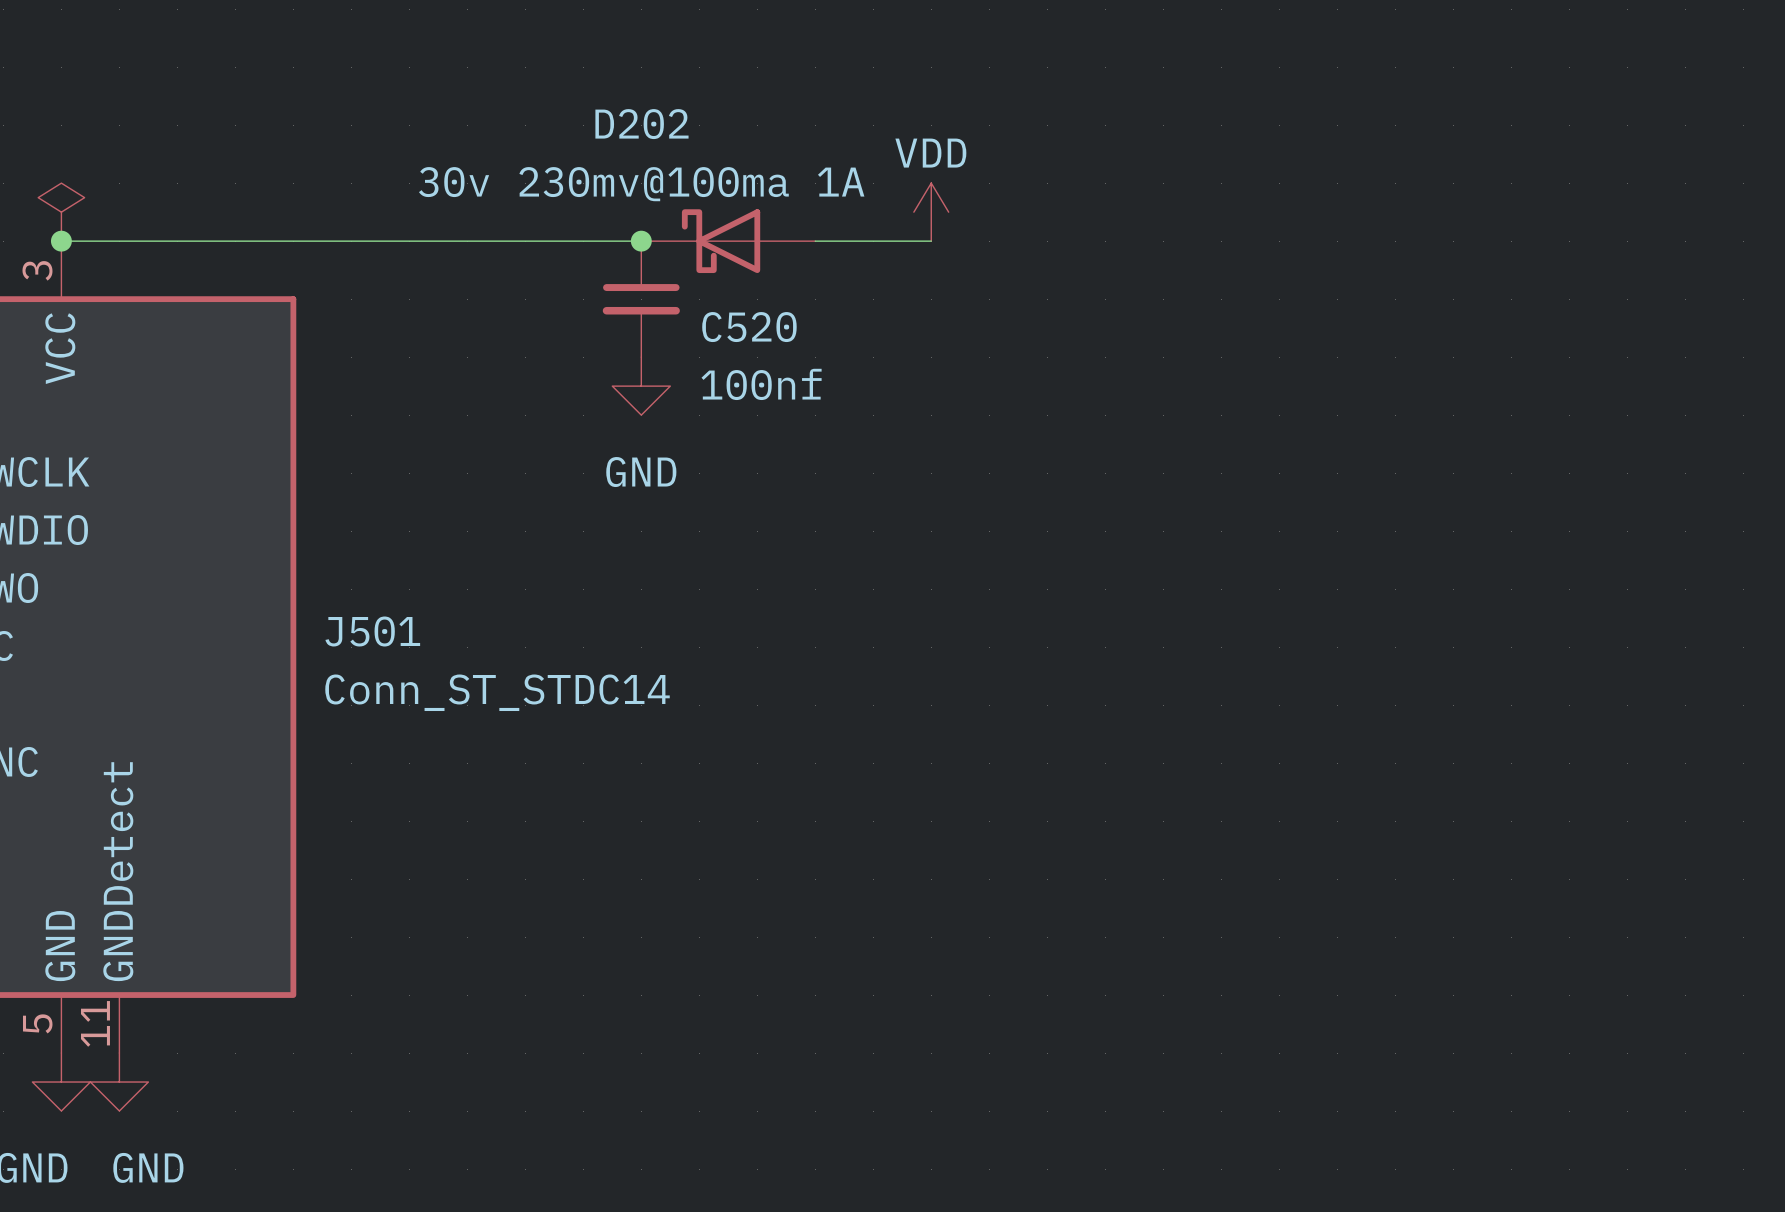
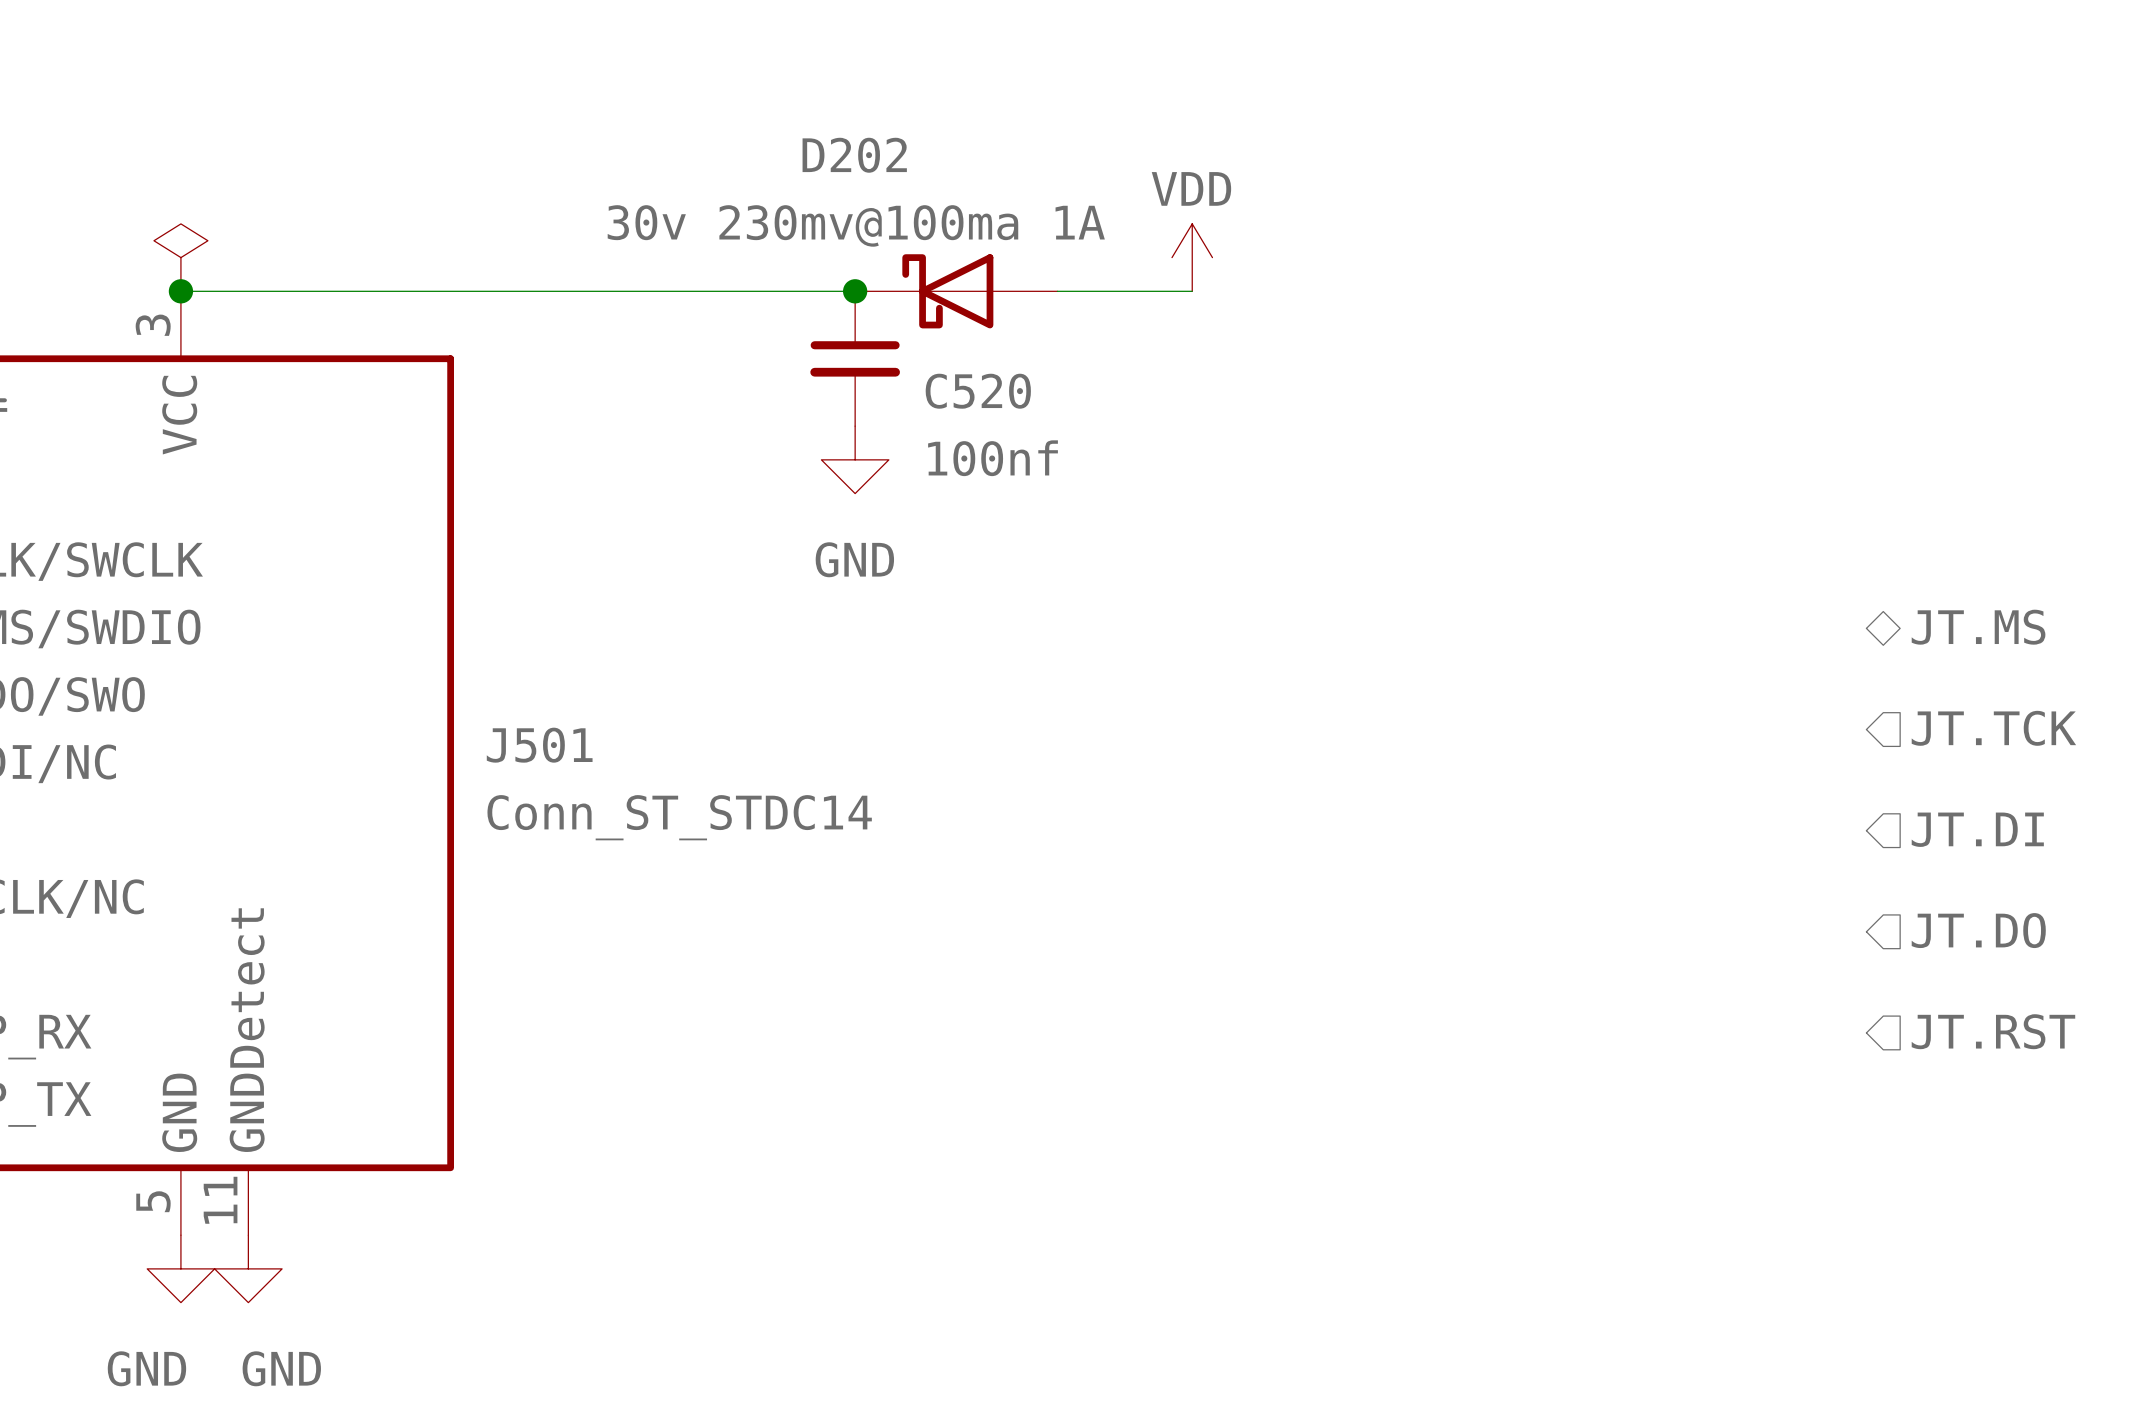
hierarchical label: none -> JT.MS (1978, 627)
hierarchical label: none -> JT.TCK (1993, 728)
hierarchical label: none -> JT.DI (1977, 829)
hierarchical label: none -> JT.DO (1978, 930)
hierarchical label: none -> JT.RST (1993, 1031)

